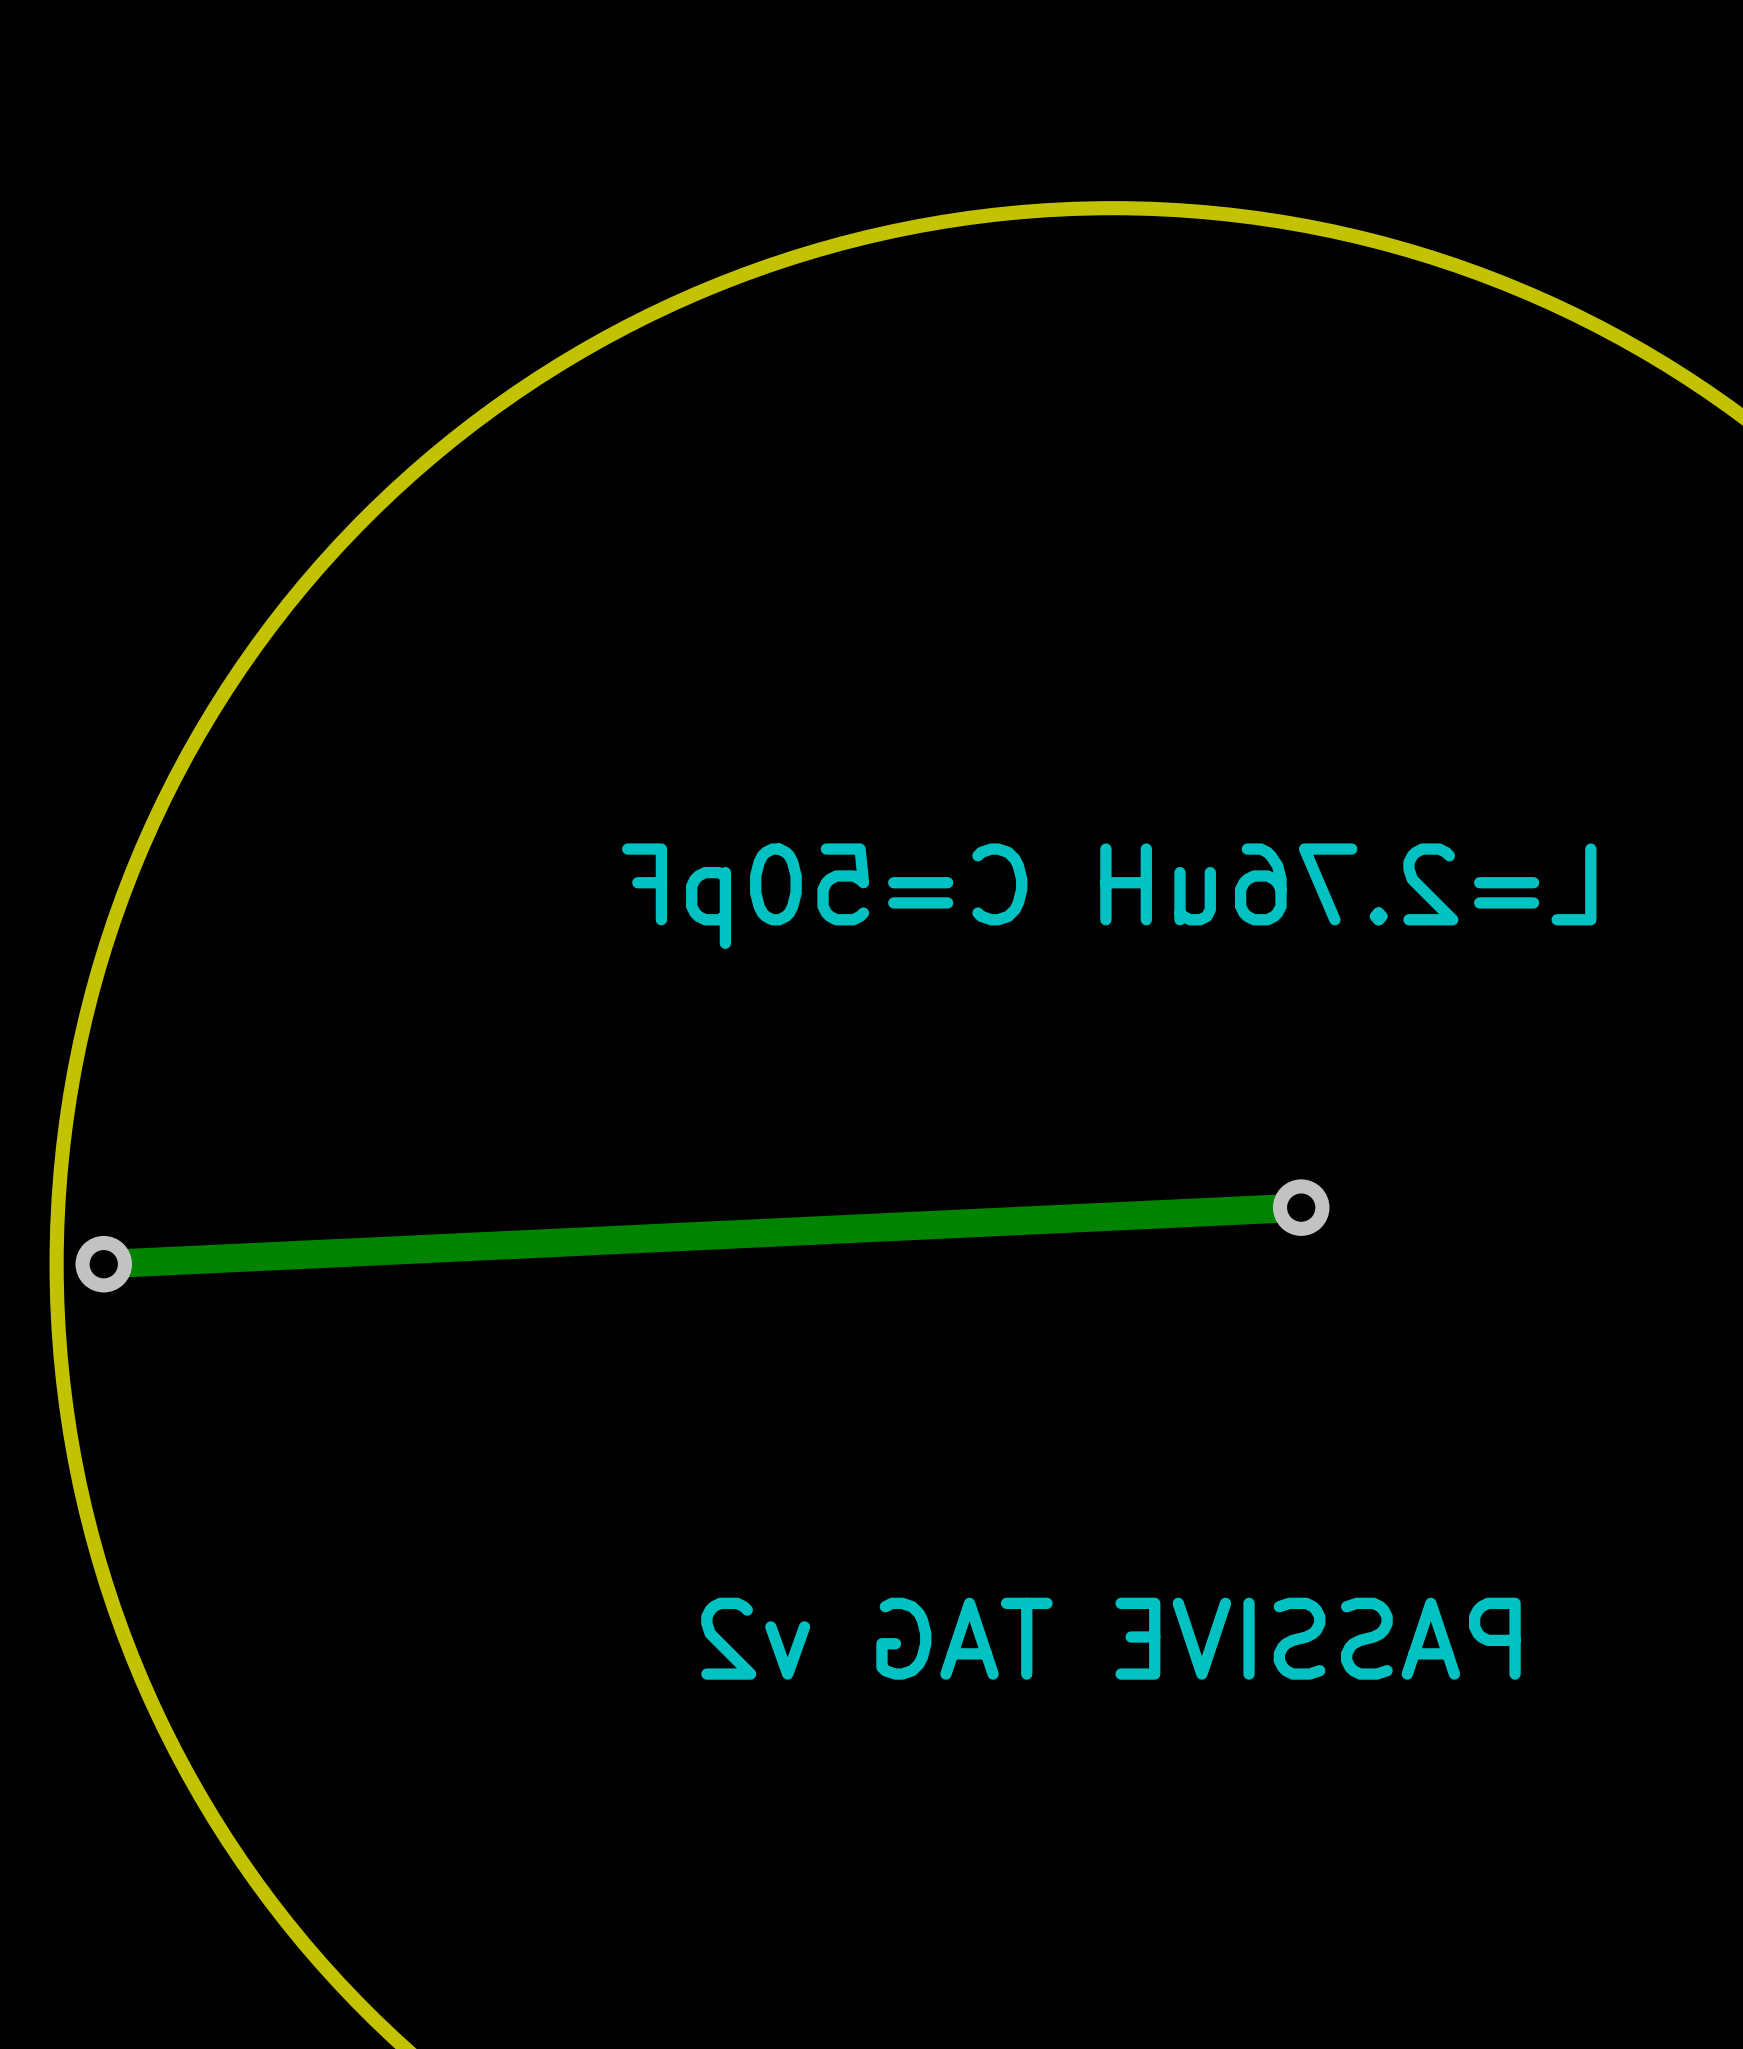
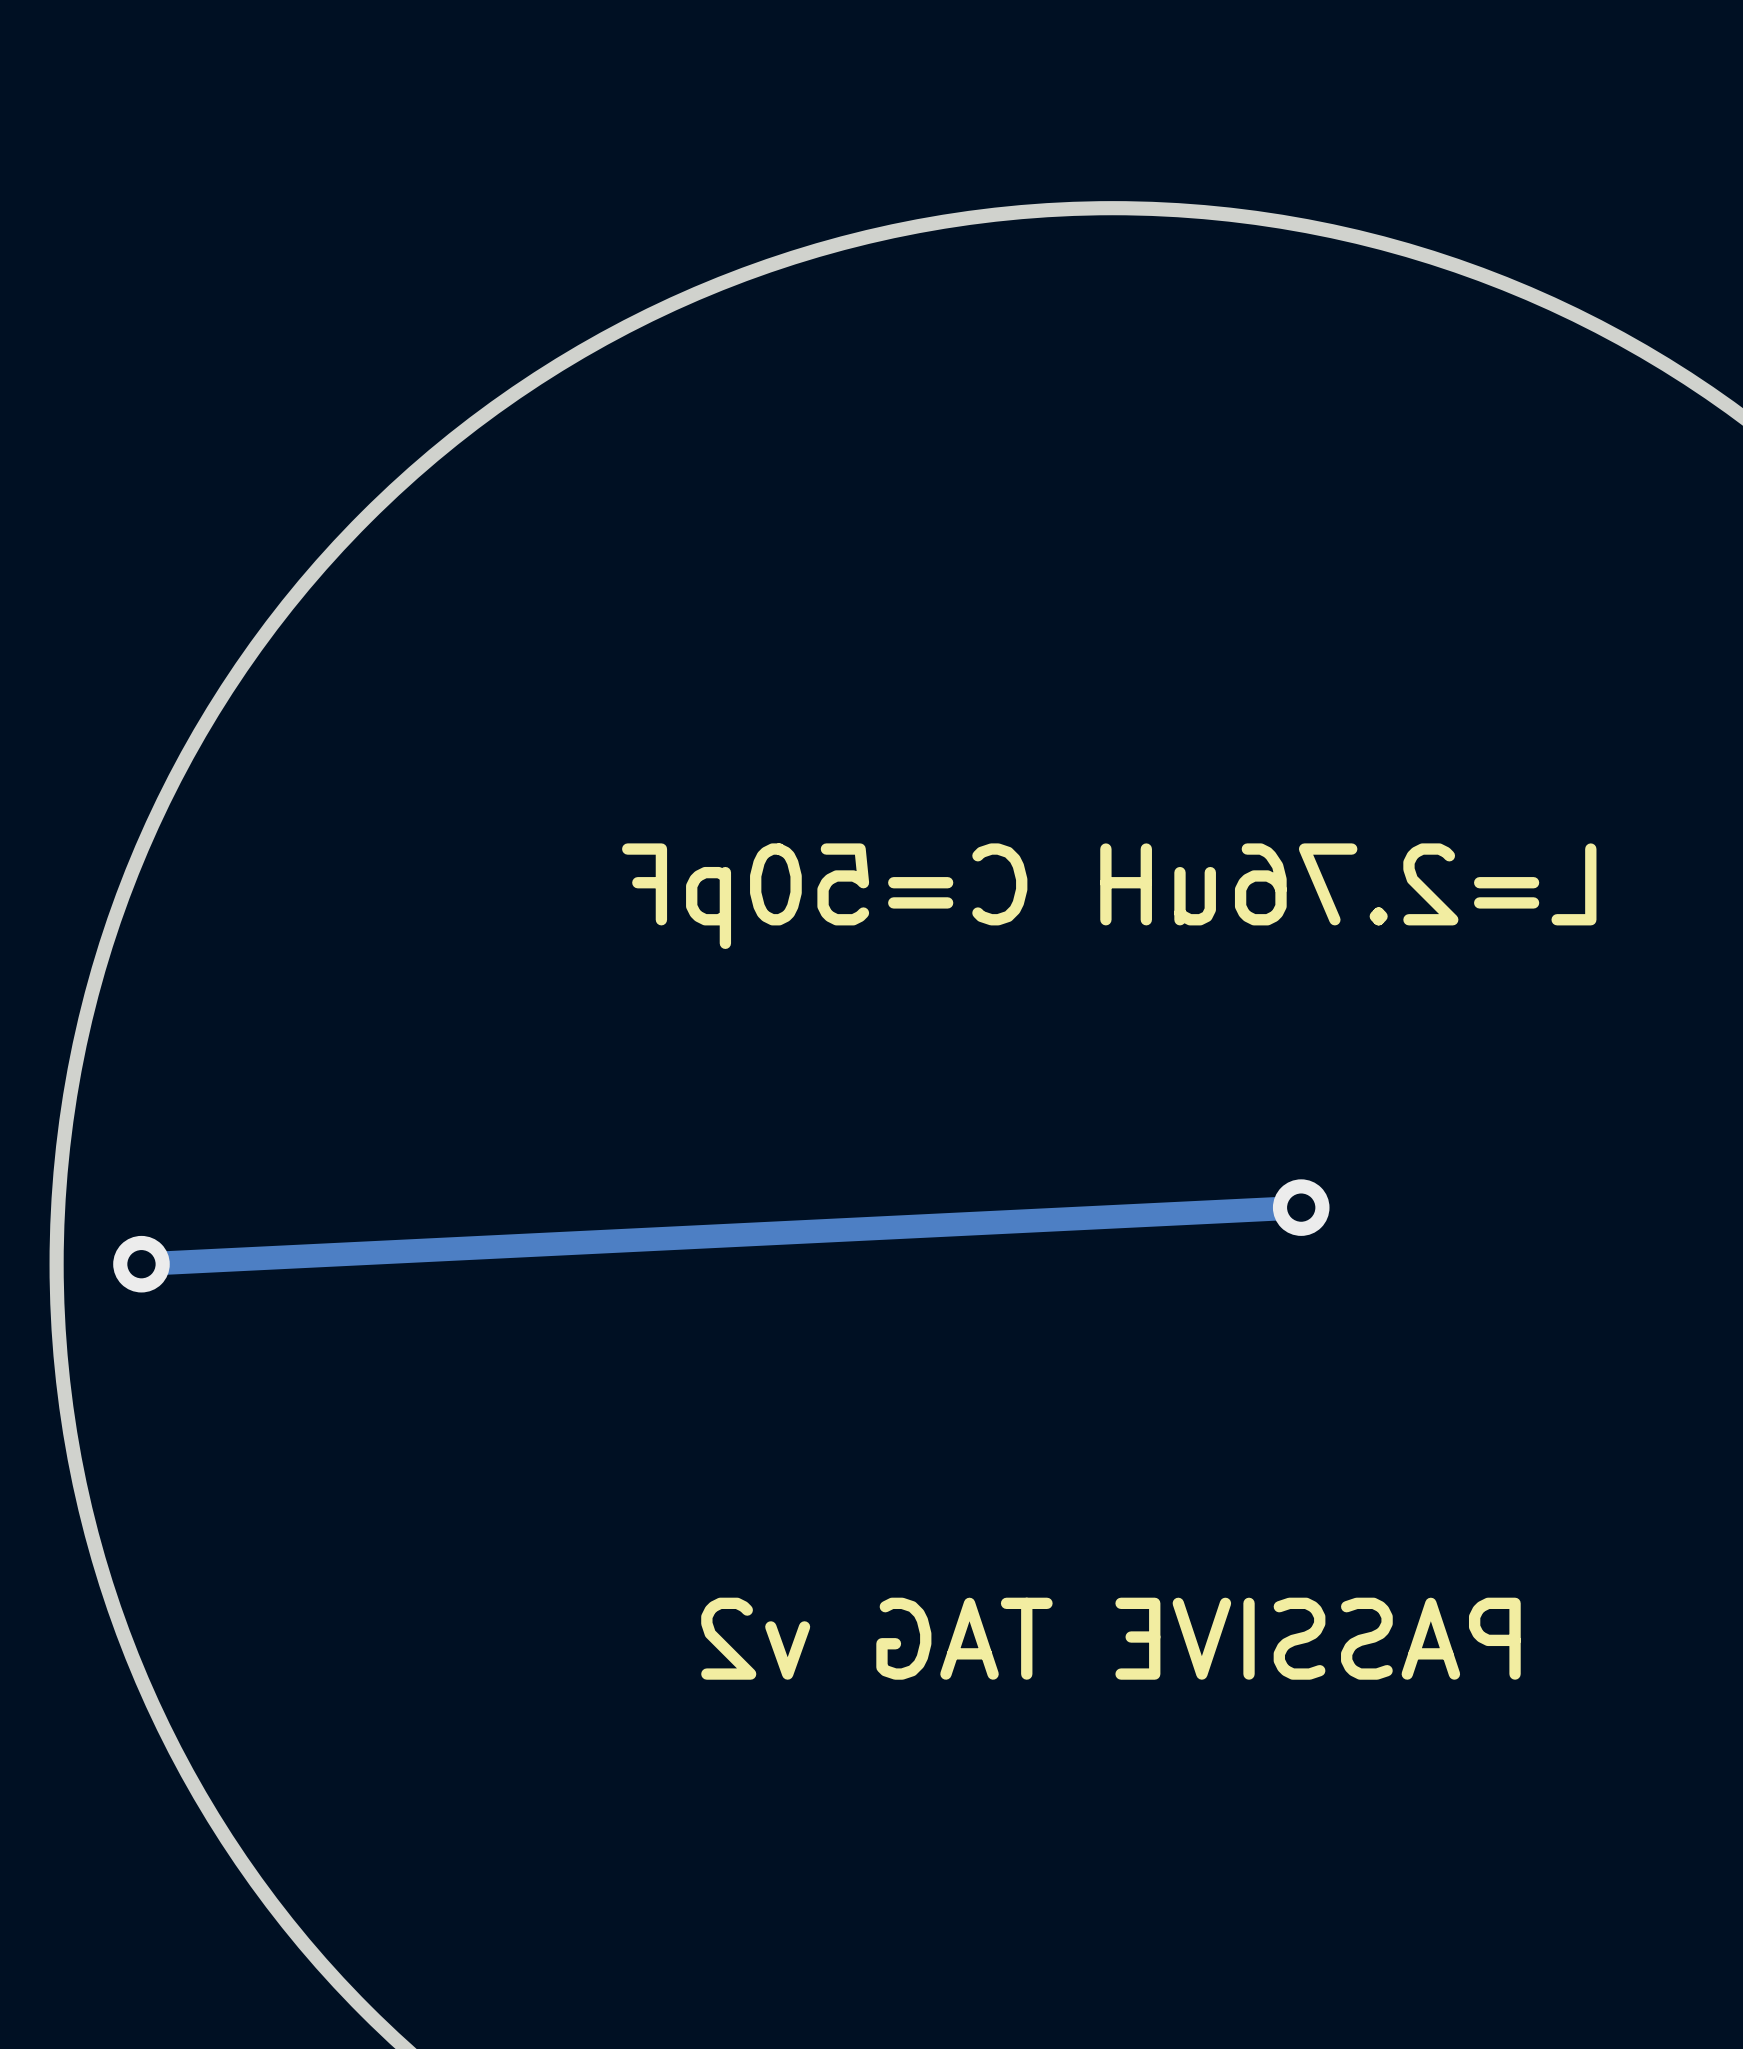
track: (1301, 1207) (103, 1264) -> (1301, 1207) (141, 1264)
via position: (103, 1264) -> (141, 1264)

